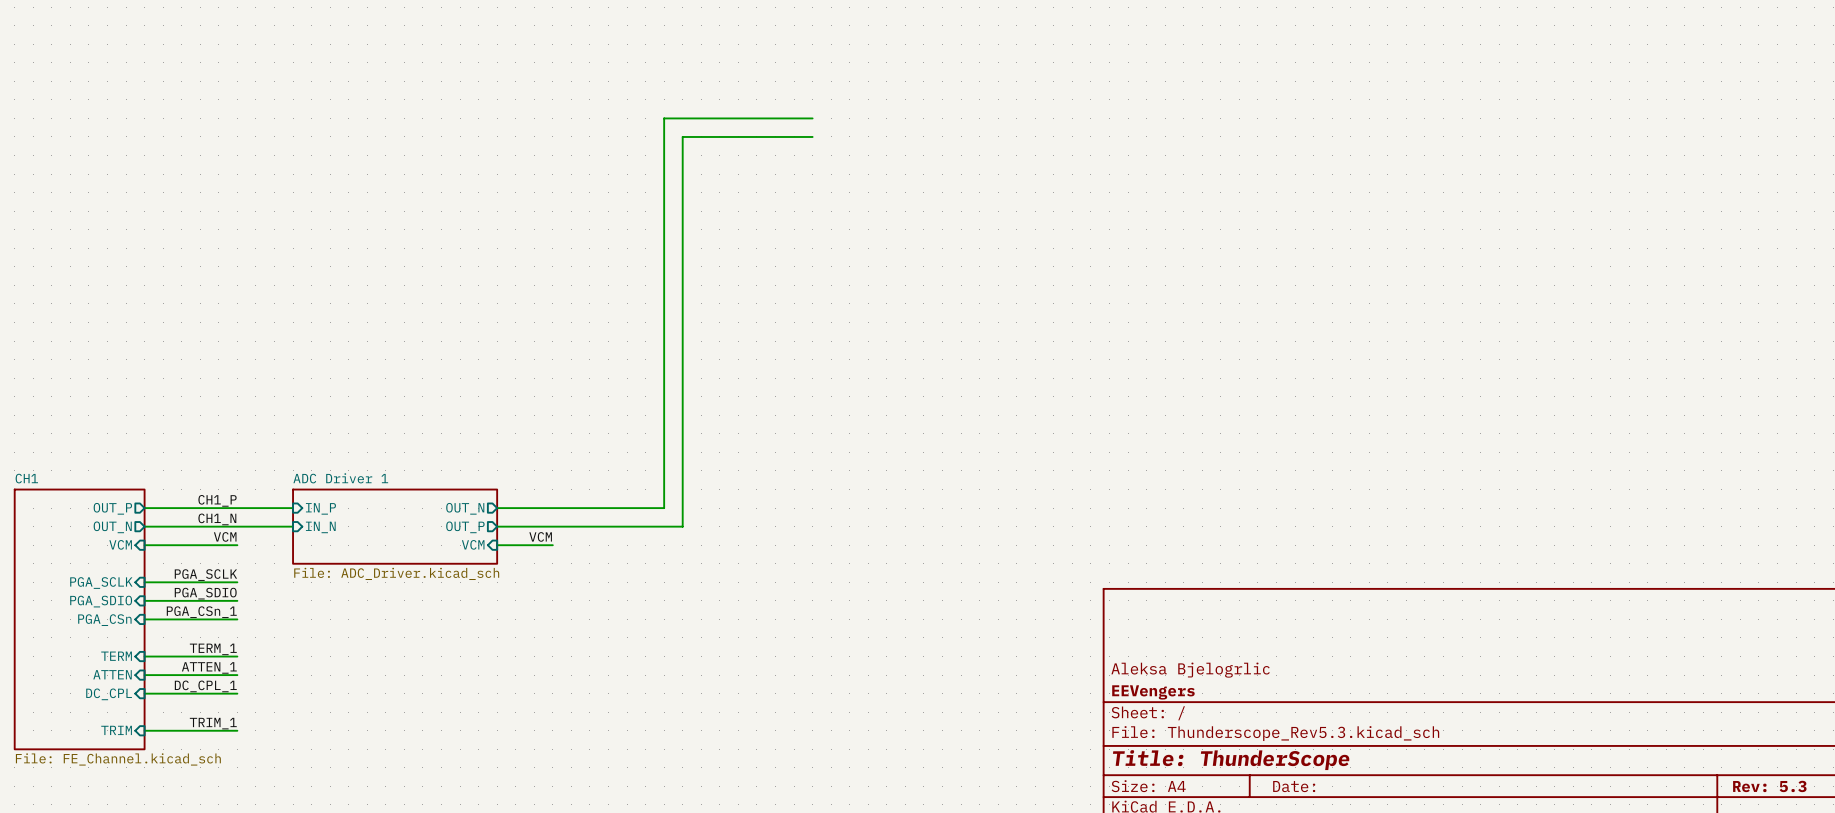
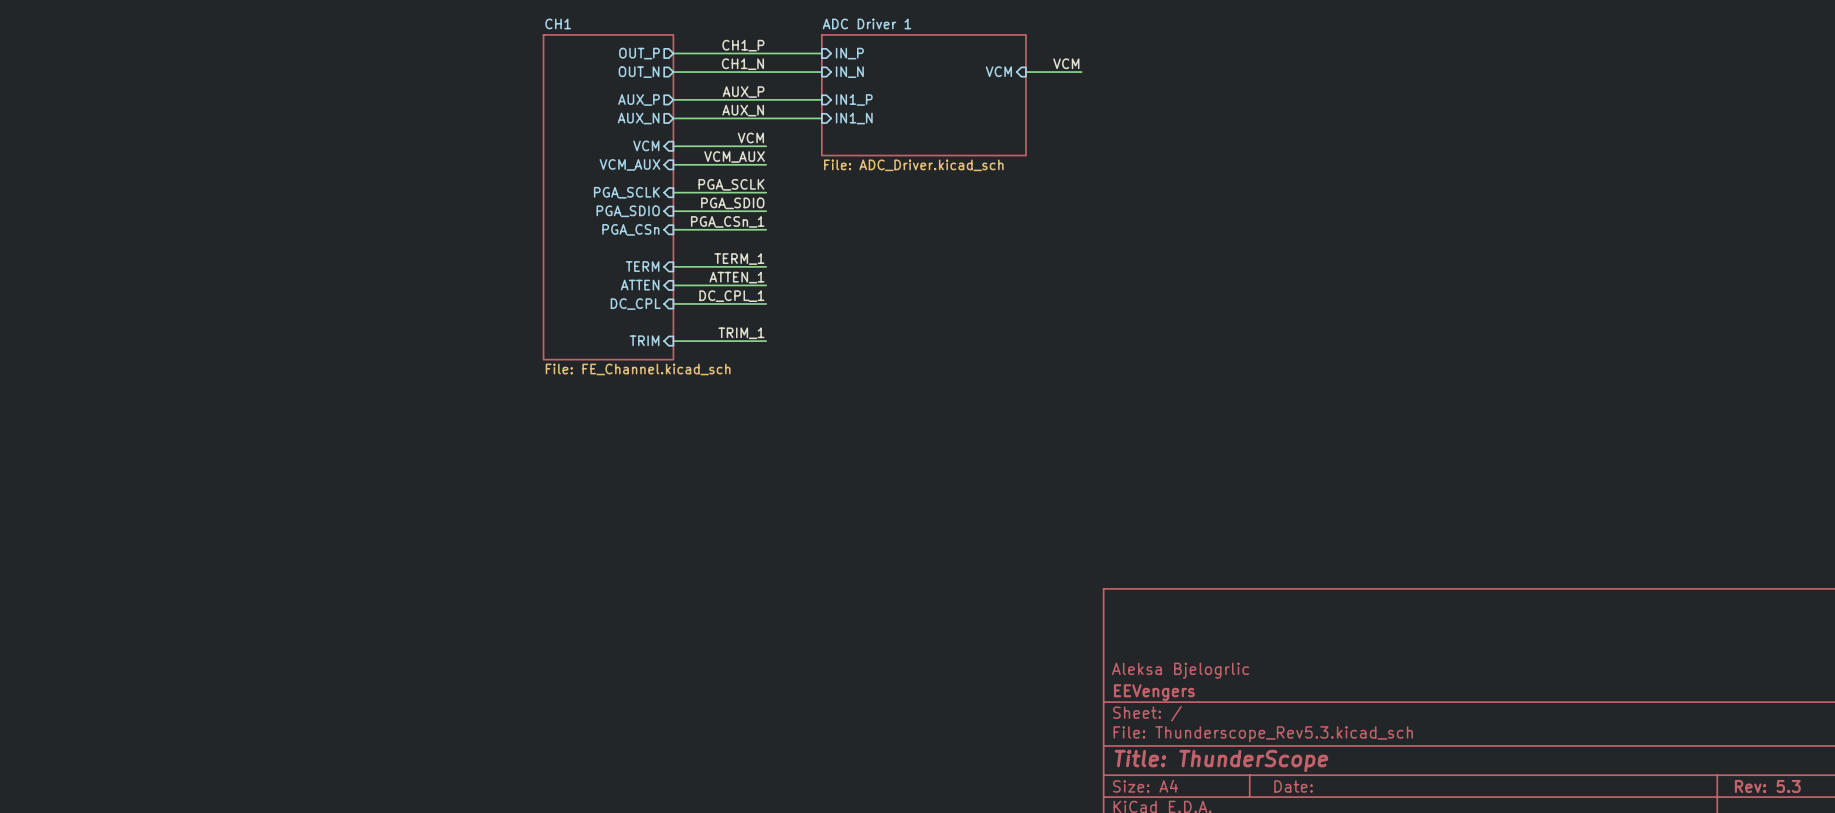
label: none -> CH1_P (743, 45)
wire: none -> (673, 53) (821, 53)
sheet pin: none -> OUT_P (639, 53)
sheet pin: none -> IN_P (849, 53)
label: none -> VCM (1066, 63)
label: none -> CH1_N (742, 64)
sheet pin: none -> VCM (998, 71)
sheet pin: none -> OUT_N (639, 72)
wire: none -> (673, 72) (821, 72)
sheet pin: none -> IN_N (849, 72)
wire: none -> (1025, 72) (1081, 72)
label: none -> AUX_P (743, 92)
wire: none -> (673, 99) (821, 99)
sheet pin: none -> AUX_P (639, 99)
sheet pin: none -> IN1_P (854, 99)
label: none -> AUX_N (743, 110)
wire: (673, 118) (664, 118) (664, 508) (497, 508) -> none
wire: none -> (812, 118) (821, 118)
sheet pin: none -> AUX_N (638, 118)
sheet pin: none -> IN1_N (854, 118)
wire: (812, 136) (682, 136) (682, 526) (497, 526) -> none
label: none -> VCM (750, 137)
sheet pin: none -> VCM (646, 145)
wire: none -> (673, 146) (766, 146)
label: none -> VCM_AUX (734, 156)
wire: none -> (673, 164) (766, 164)
sheet pin: none -> VCM_AUX (629, 164)
label: none -> PGA_SCLK (731, 184)
wire: none -> (673, 192) (766, 192)
sheet pin: none -> PGA_SCLK (626, 192)
label: none -> PGA_SDIO (732, 203)
sheet pin: none -> PGA_SDIO (628, 211)
wire: none -> (673, 211) (766, 211)
label: none -> PGA_CSn_1 (727, 221)
wire: none -> (673, 229) (766, 229)
sheet pin: none -> PGA_CSn (630, 229)
label: none -> TERM_1 (739, 259)
sheet pin: none -> TERM (642, 266)
wire: none -> (673, 266) (766, 266)
label: none -> ATTEN_1 (736, 277)
sheet pin: none -> ATTEN (640, 285)
wire: none -> (673, 285) (766, 285)
label: none -> DC_CPL_1 (731, 296)
wire: none -> (673, 303) (766, 303)
sheet pin: none -> DC_CPL (635, 304)
label: none -> TRIM_1 (741, 333)
sheet pin: none -> TRIM (644, 340)
wire: none -> (673, 341) (766, 341)
sheet CH1 name position: CH1 (26, 478) -> CH1 (558, 23)
sheet ADC Driver 1 name position: ADC Driver 1 (340, 478) -> ADC Driver 1 (867, 23)
sheet ADC Driver 1 shape: [292, 488, 498, 565] -> [821, 34, 1027, 157]
sheet CH1 shape: [14, 489, 145, 750] -> [543, 34, 674, 360]
label: CH1_P (217, 500) -> none
sheet pin: OUT_P (112, 508) -> none
wire: (144, 508) (293, 508) -> none
sheet pin: IN_P (320, 508) -> none
sheet pin: OUT_N (465, 508) -> none
label: CH1_N (217, 519) -> none
wire: (144, 526) (293, 526) -> none
sheet pin: OUT_N (112, 527) -> none
sheet pin: IN_N (320, 527) -> none
sheet pin: OUT_P (465, 527) -> none
label: VCM (225, 536) -> none
label: VCM (540, 536) -> none
sheet pin: VCM (120, 544) -> none
sheet pin: VCM (473, 544) -> none
wire: (144, 545) (237, 545) -> none
wire: (497, 545) (552, 545) -> none
sheet ADC Driver 1 value position: File: ADC_Driver.kicad_sch (396, 573) -> File: ADC_Driver.kicad_sch (913, 165)
label: PGA_SCLK (205, 575) -> none
wire: (144, 582) (237, 582) -> none
sheet pin: PGA_SCLK (101, 583) -> none
label: PGA_SDIO (205, 593) -> none
wire: (144, 600) (237, 600) -> none
sheet pin: PGA_SDIO (101, 601) -> none
label: PGA_CSn_1 (201, 612) -> none
wire: (144, 619) (237, 619) -> none
sheet pin: PGA_CSn (104, 620) -> none
label: TERM_1 (213, 649) -> none
sheet pin: TERM (116, 656) -> none
wire: (144, 656) (237, 656) -> none
label: ATTEN_1 (209, 667) -> none
sheet pin: ATTEN (112, 674) -> none
wire: (144, 675) (237, 675) -> none
label: DC_CPL_1 (205, 686) -> none
wire: (144, 693) (237, 693) -> none
sheet pin: DC_CPL (109, 694) -> none
label: TRIM_1 (213, 723) -> none
sheet pin: TRIM (116, 730) -> none
wire: (144, 730) (237, 730) -> none
sheet CH1 value position: File: FE_Channel.kicad_sch (118, 759) -> File: FE_Channel.kicad_sch (638, 369)

